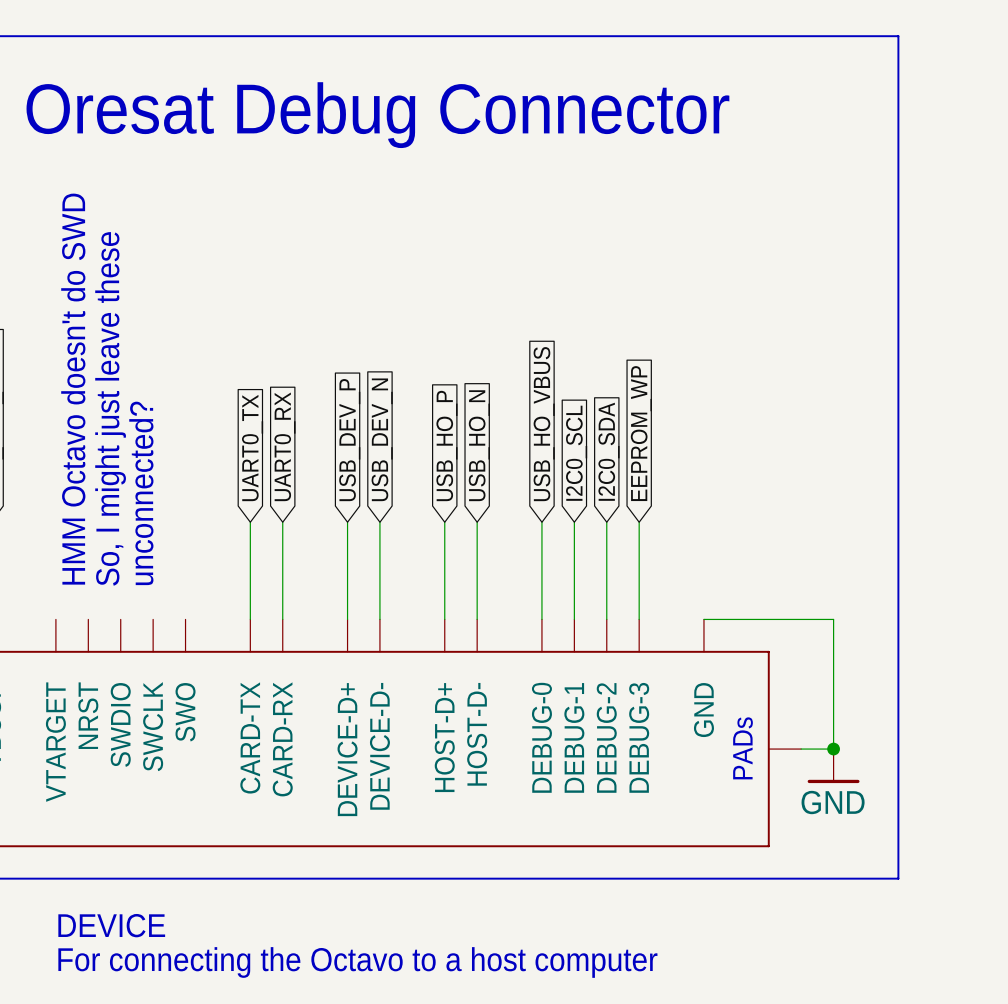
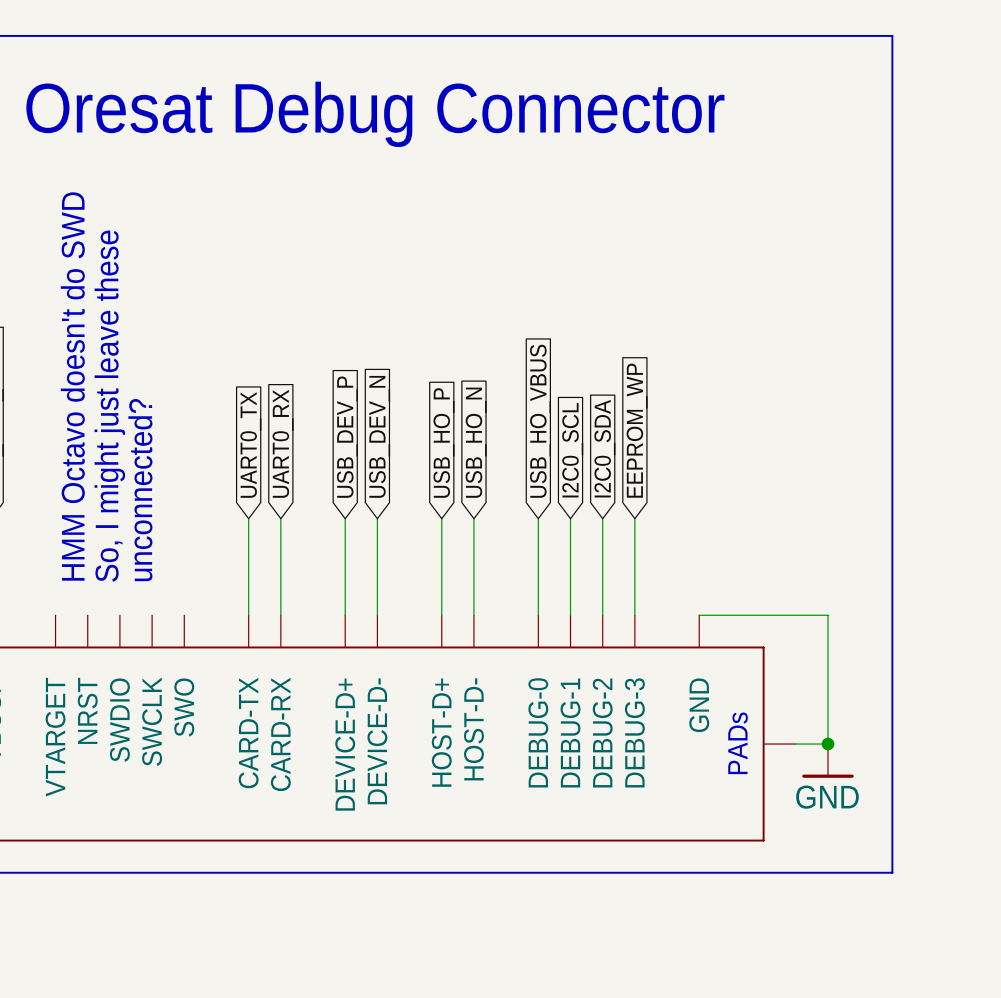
text: DEVICE (111, 925) -> none
text: For connecting the Octavo to a host computer (357, 962) -> none

